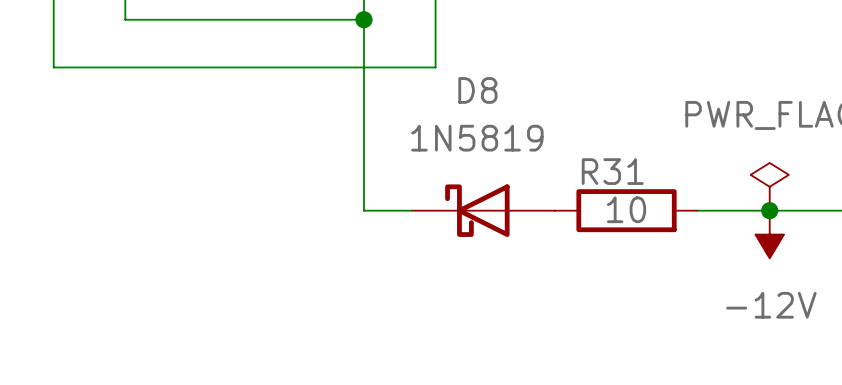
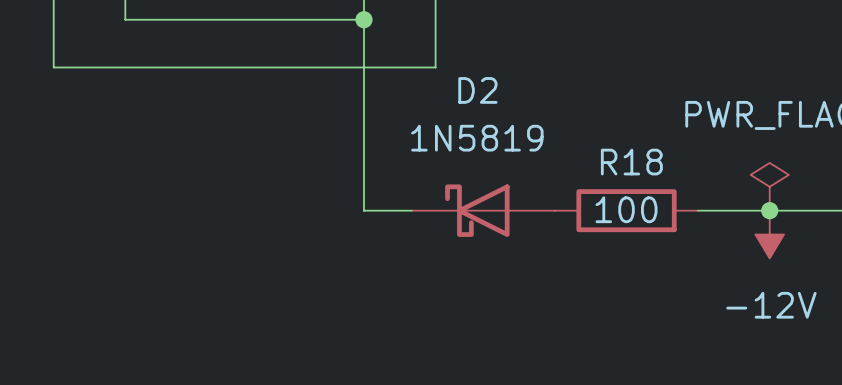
D8 name: D8 (477, 90) -> D2 (477, 90)
R31 name: R31 (612, 171) -> R18 (631, 162)
R31 value: 10 (626, 209) -> 100 (626, 209)

